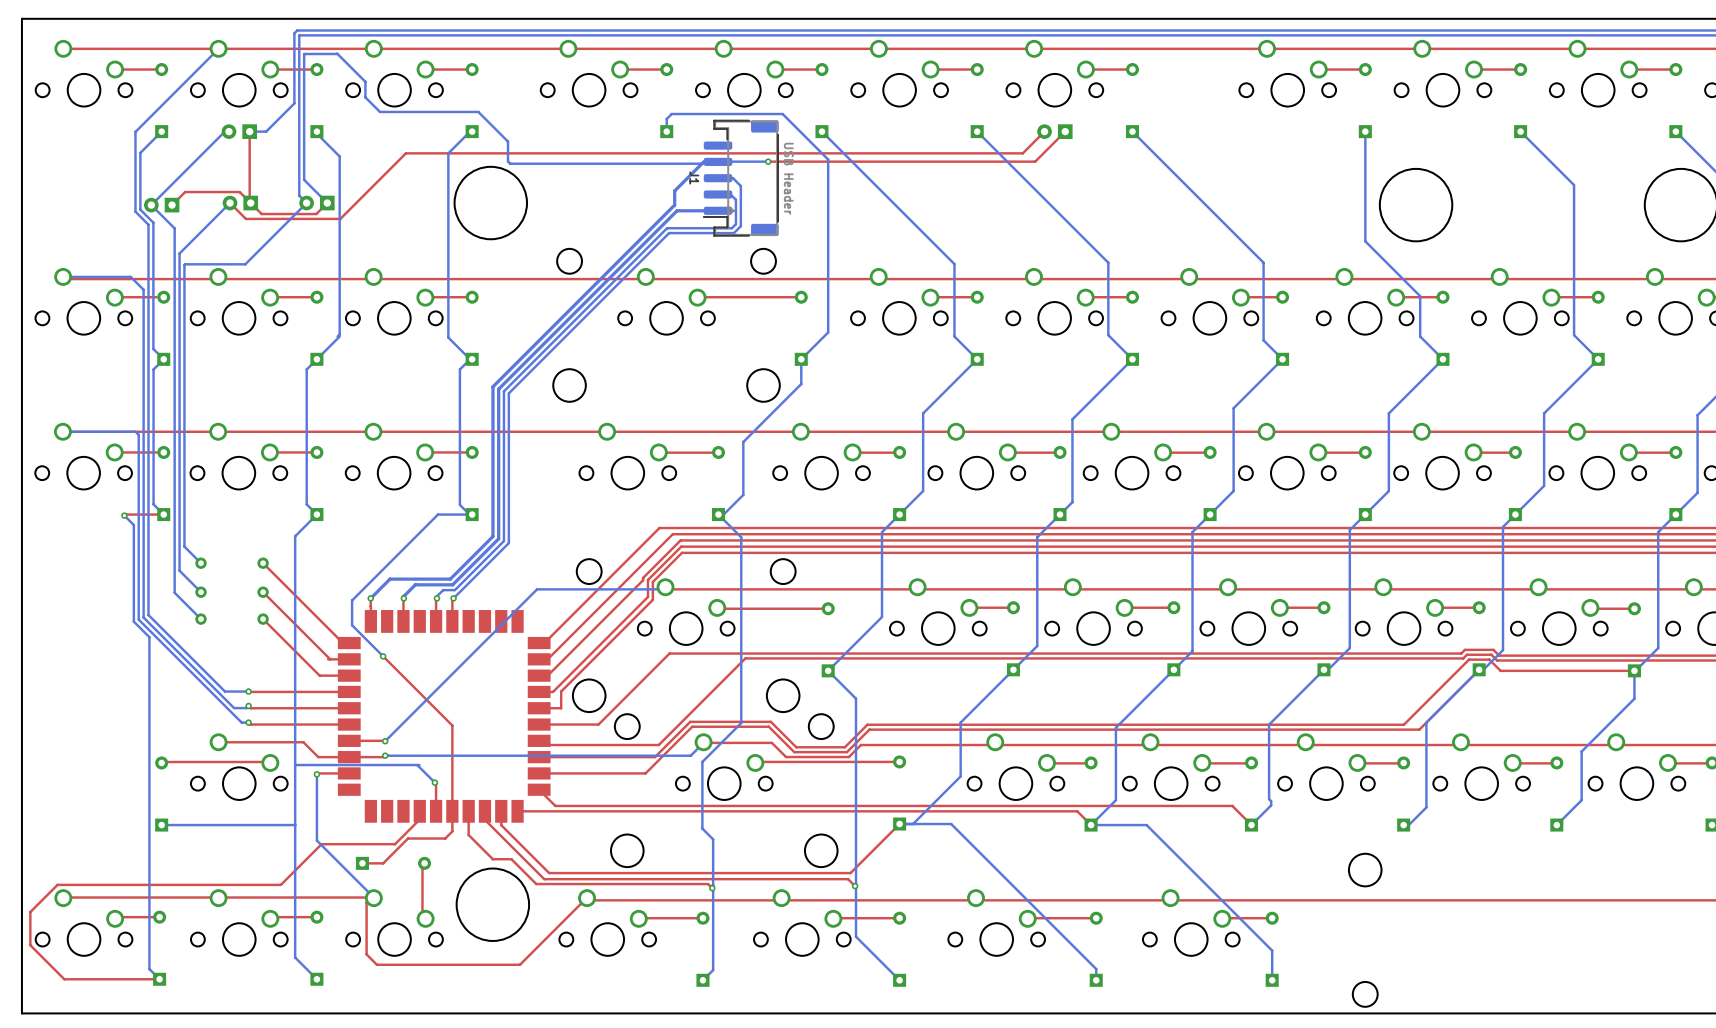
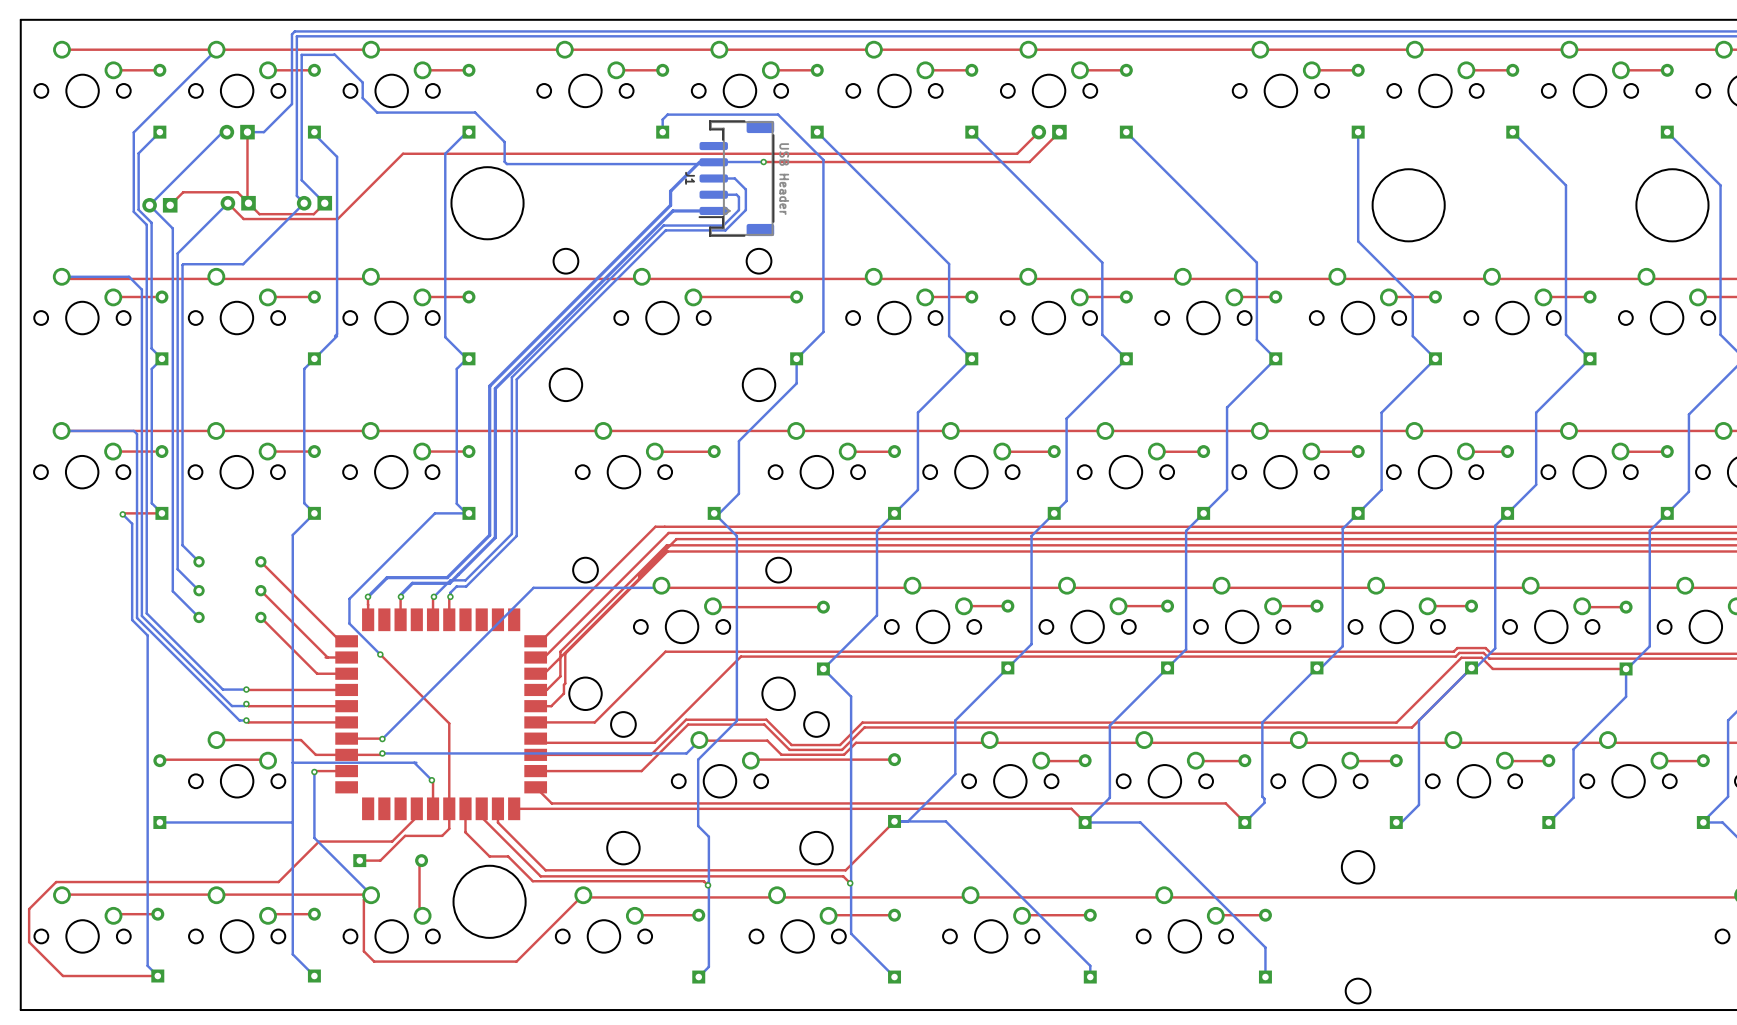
bottom track: (732, 178) (740, 186) (740, 226) (733, 233) (669, 233) (508, 393) (508, 543) (453, 598) -> none
bottom track: (730, 194) (735, 199) (735, 224) -> (728, 178) (734, 178) (745, 189) (745, 210) (731, 224)
bottom track: none -> (726, 194) (736, 194) (738, 197) (738, 210) (723, 225) (663, 225) (511, 377) (511, 534) (465, 580) (450, 580) (433, 596)
bottom track: (731, 228) (667, 228) (503, 391) (503, 541) (454, 590) (443, 590) (436, 598) -> (727, 228) (725, 230) (665, 230) (516, 379) (516, 536) (466, 586) (456, 586) (450, 592) (450, 596)
top track: (681, 546) (647, 579) (647, 596) (553, 691) (550, 691) -> (677, 545) (666, 545) (560, 651) (560, 676) (546, 689)
top track: (682, 552) (652, 581) (652, 599) (561, 691) (561, 708) (554, 708) -> (677, 551) (667, 551) (565, 653) (563, 693) (551, 706)

